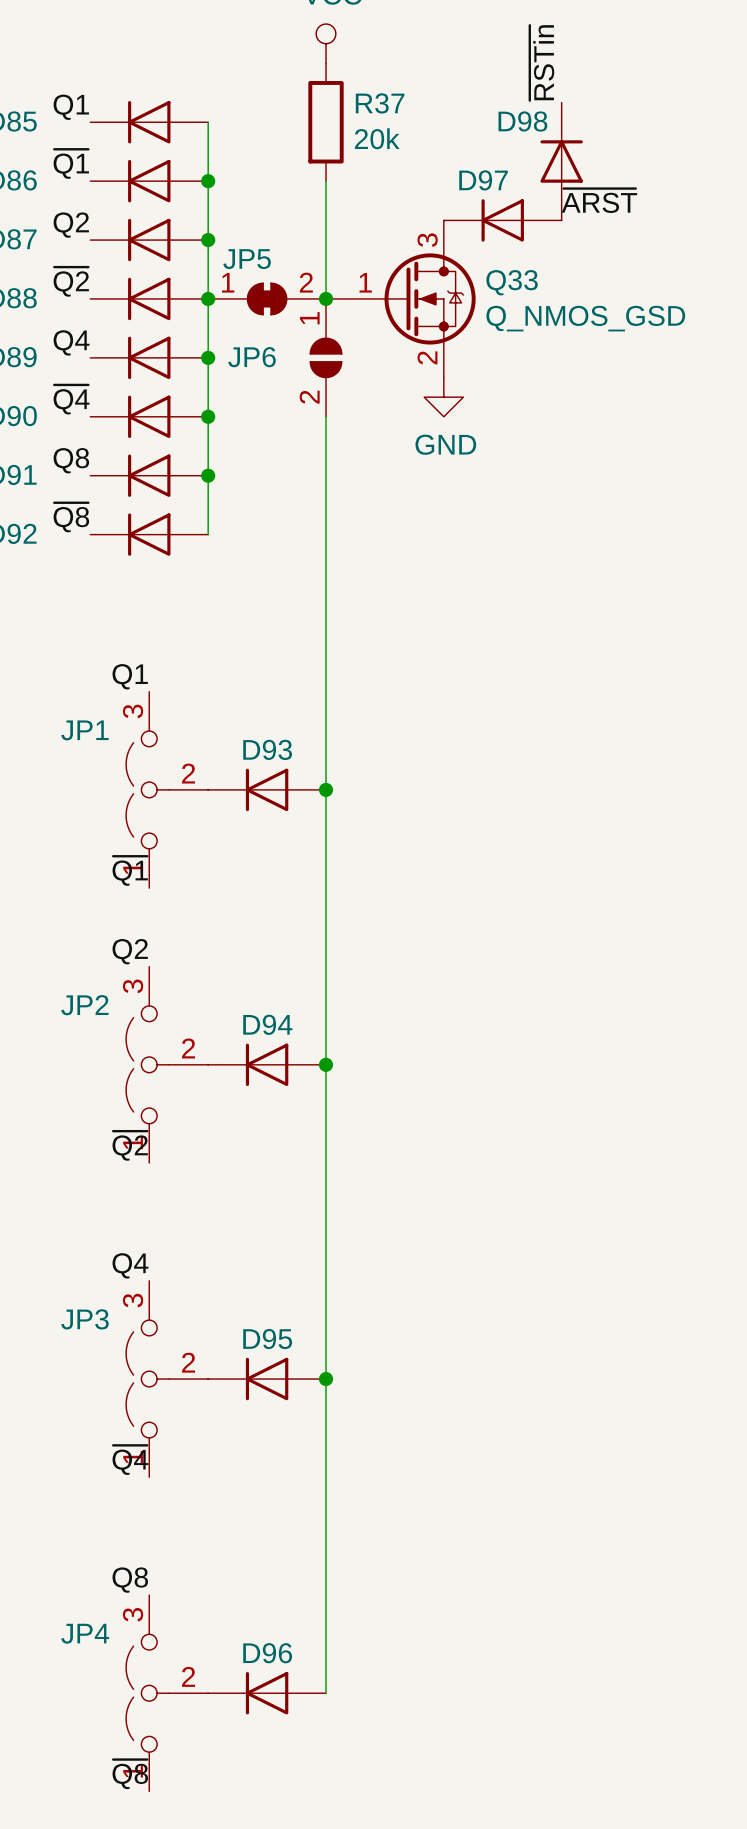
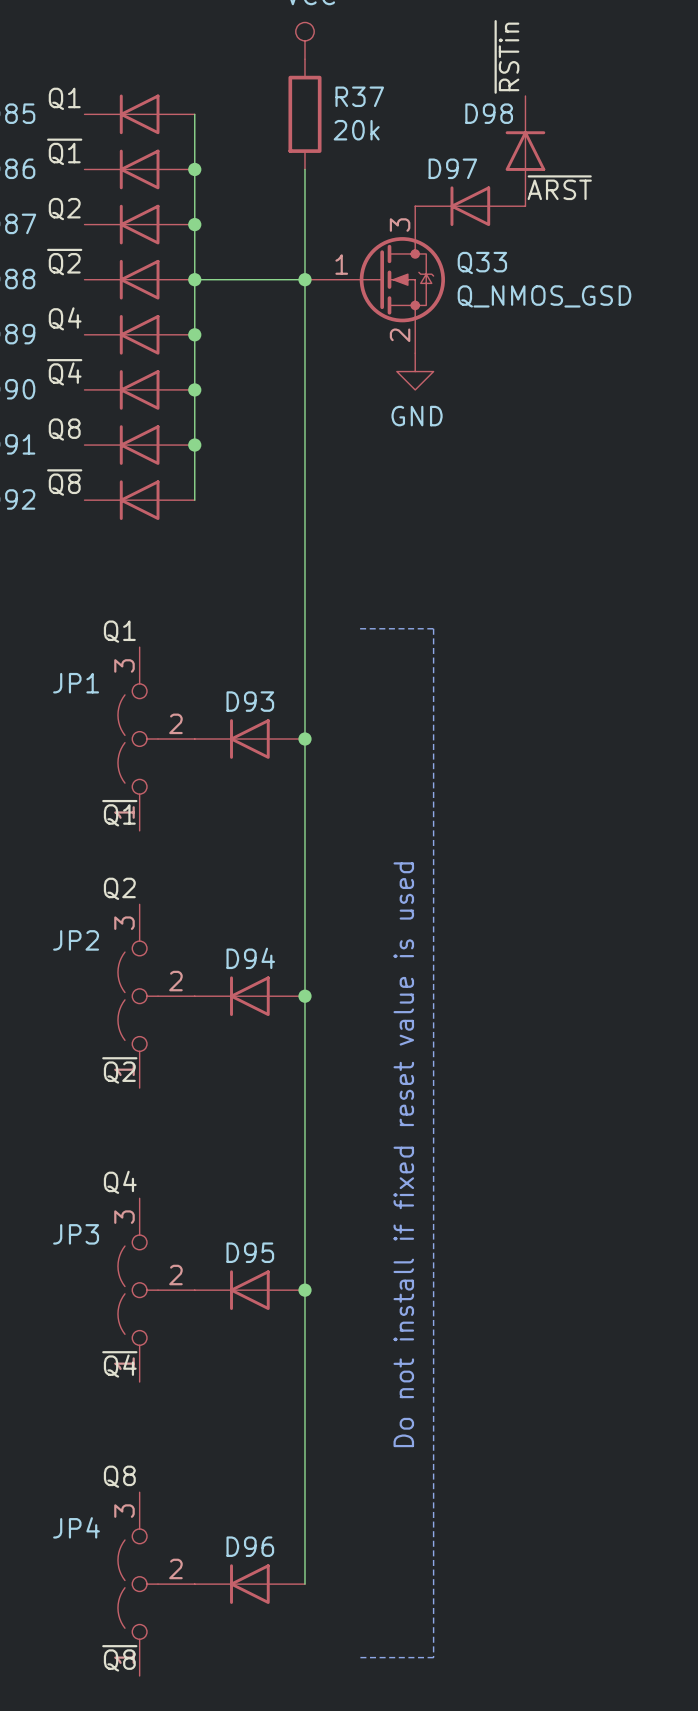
JP5: (267, 298) -> none
JP6: (326, 357) -> none
line: none -> (360, 628) (433, 628) (433, 1657) (360, 1657)
text: none -> Do not install if fixed reset value is used (403, 1154)

